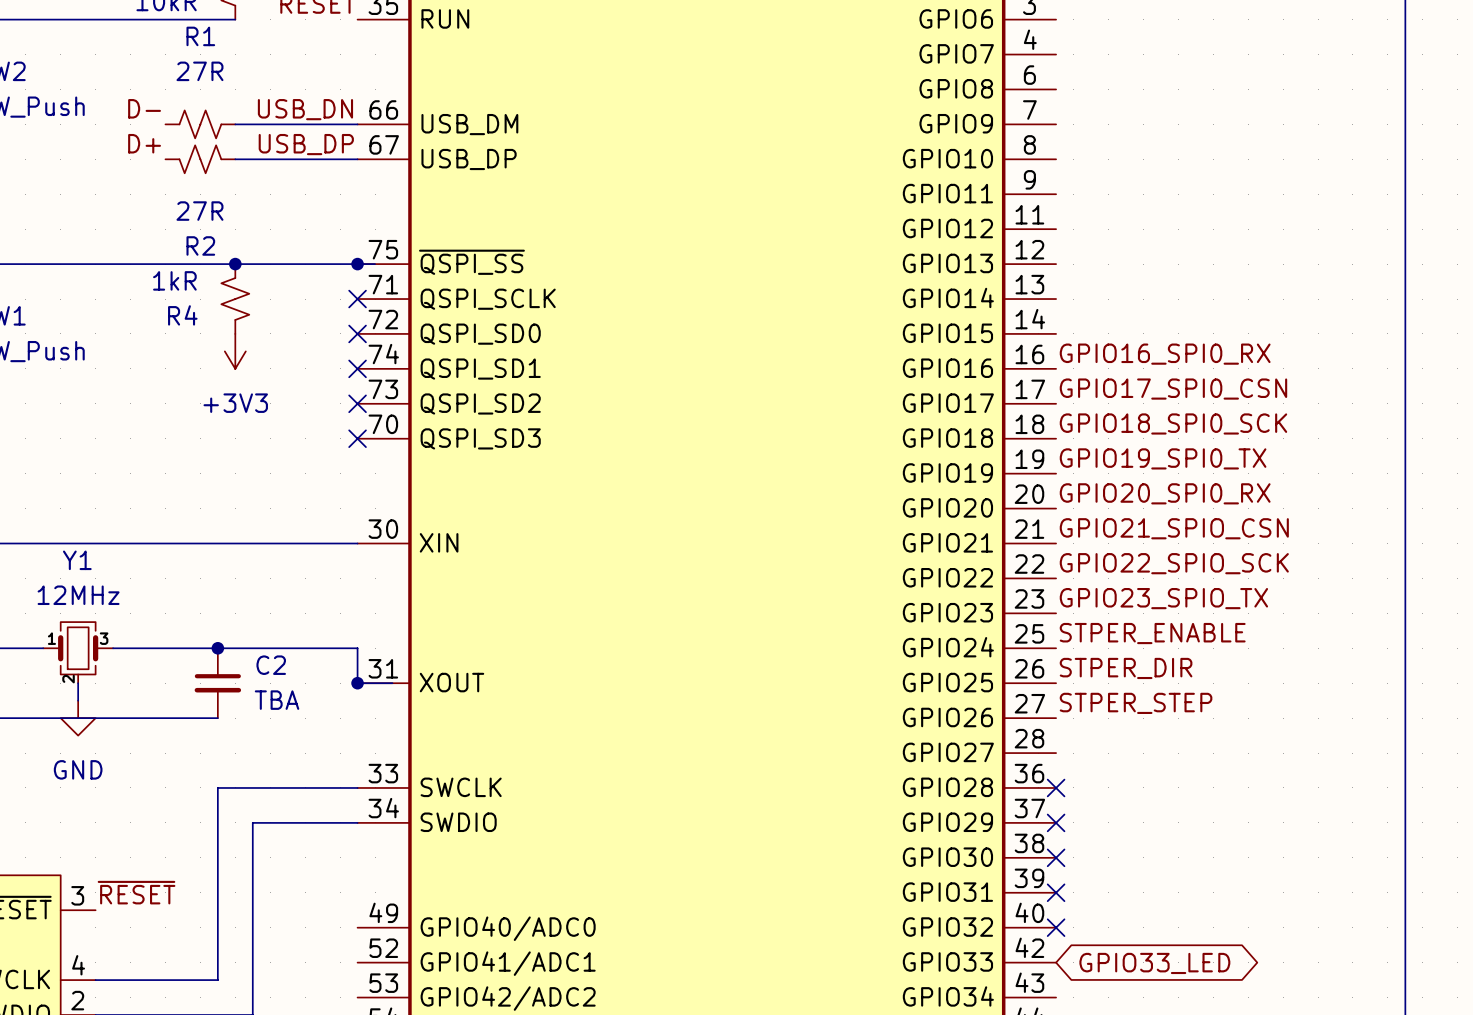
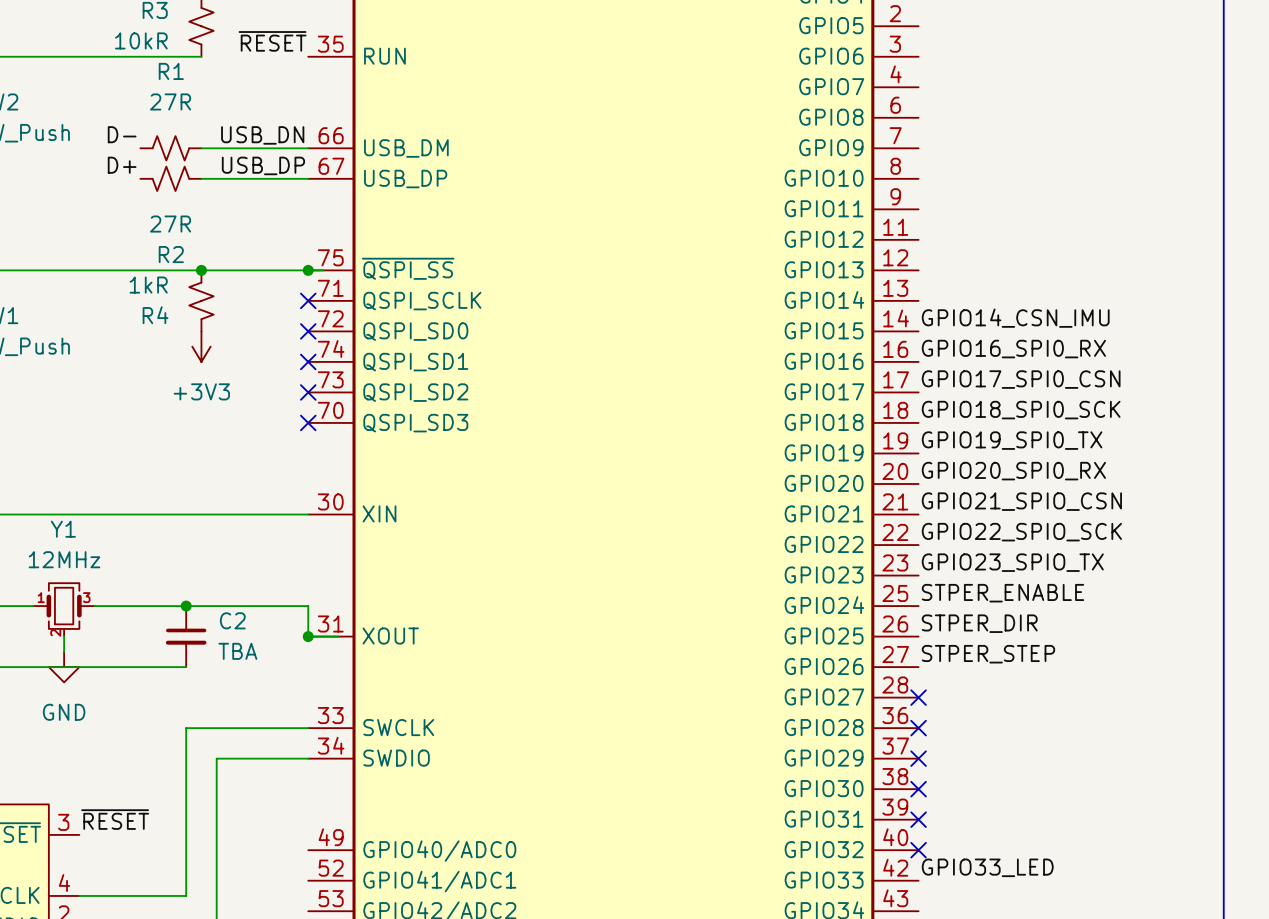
label: none -> GPIO14_CSN_IMU (1015, 318)
no-connect mark: none -> (918, 697)
label: none -> GPIO33_LED (987, 867)
global label: GPIO33_LED (1154, 963) -> none

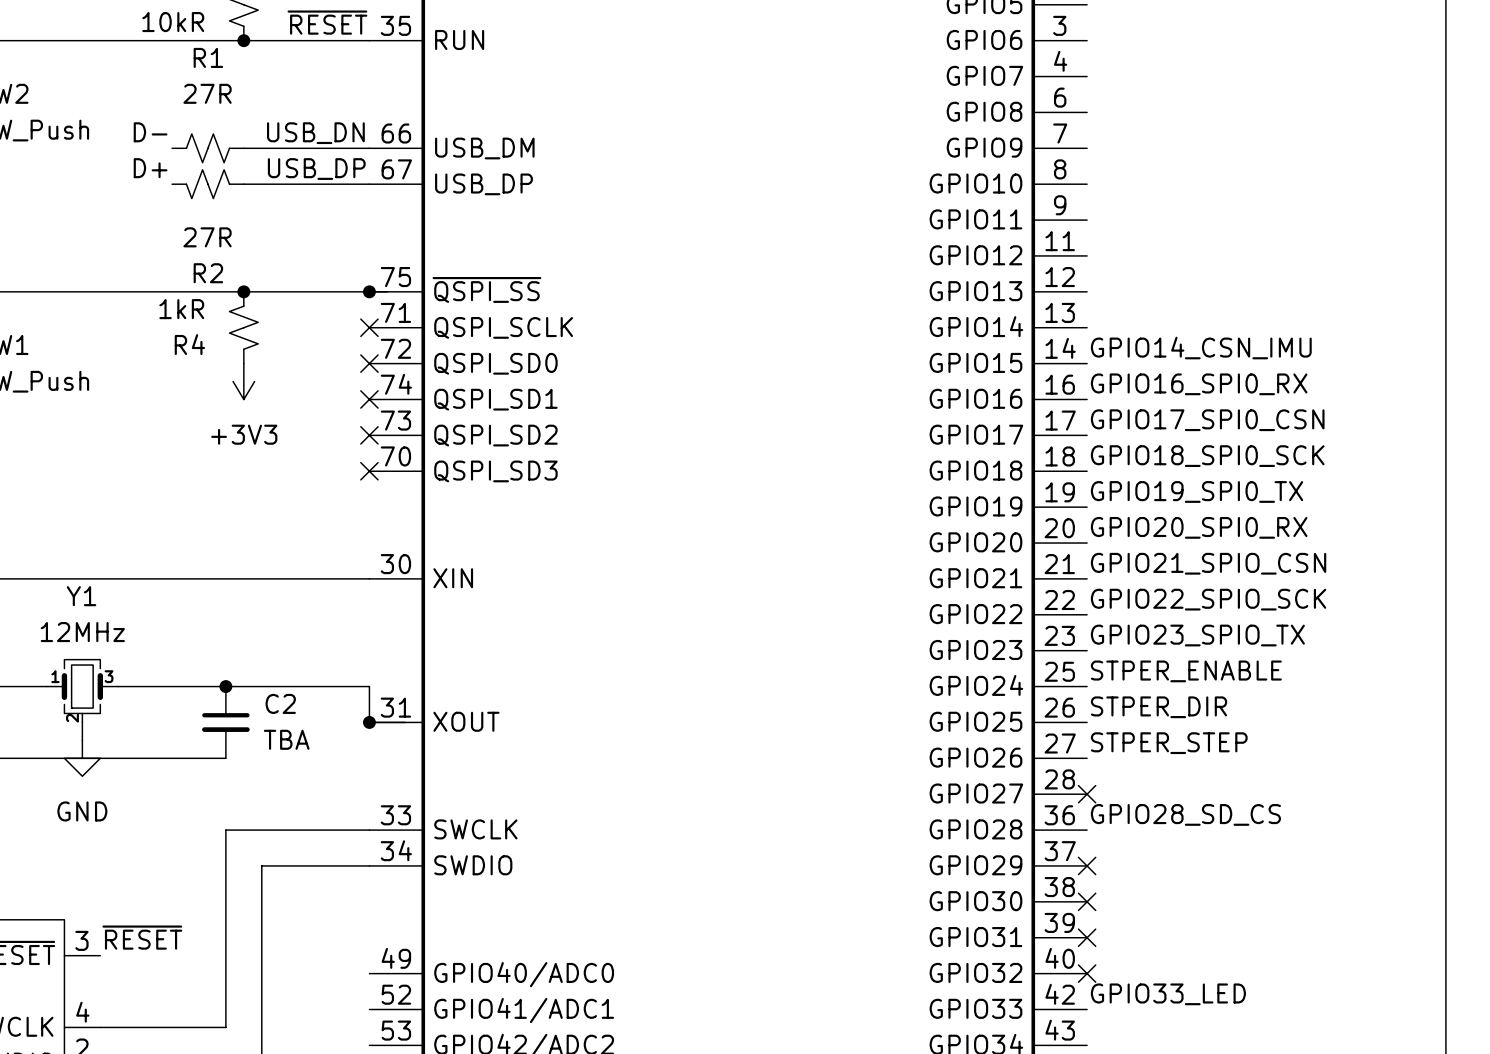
wire: none -> (243, 40) (369, 40)
junction: none -> (243, 40)
label: none -> GPIO28_SD_CS (1185, 814)
no-connect mark: (918, 728) -> none

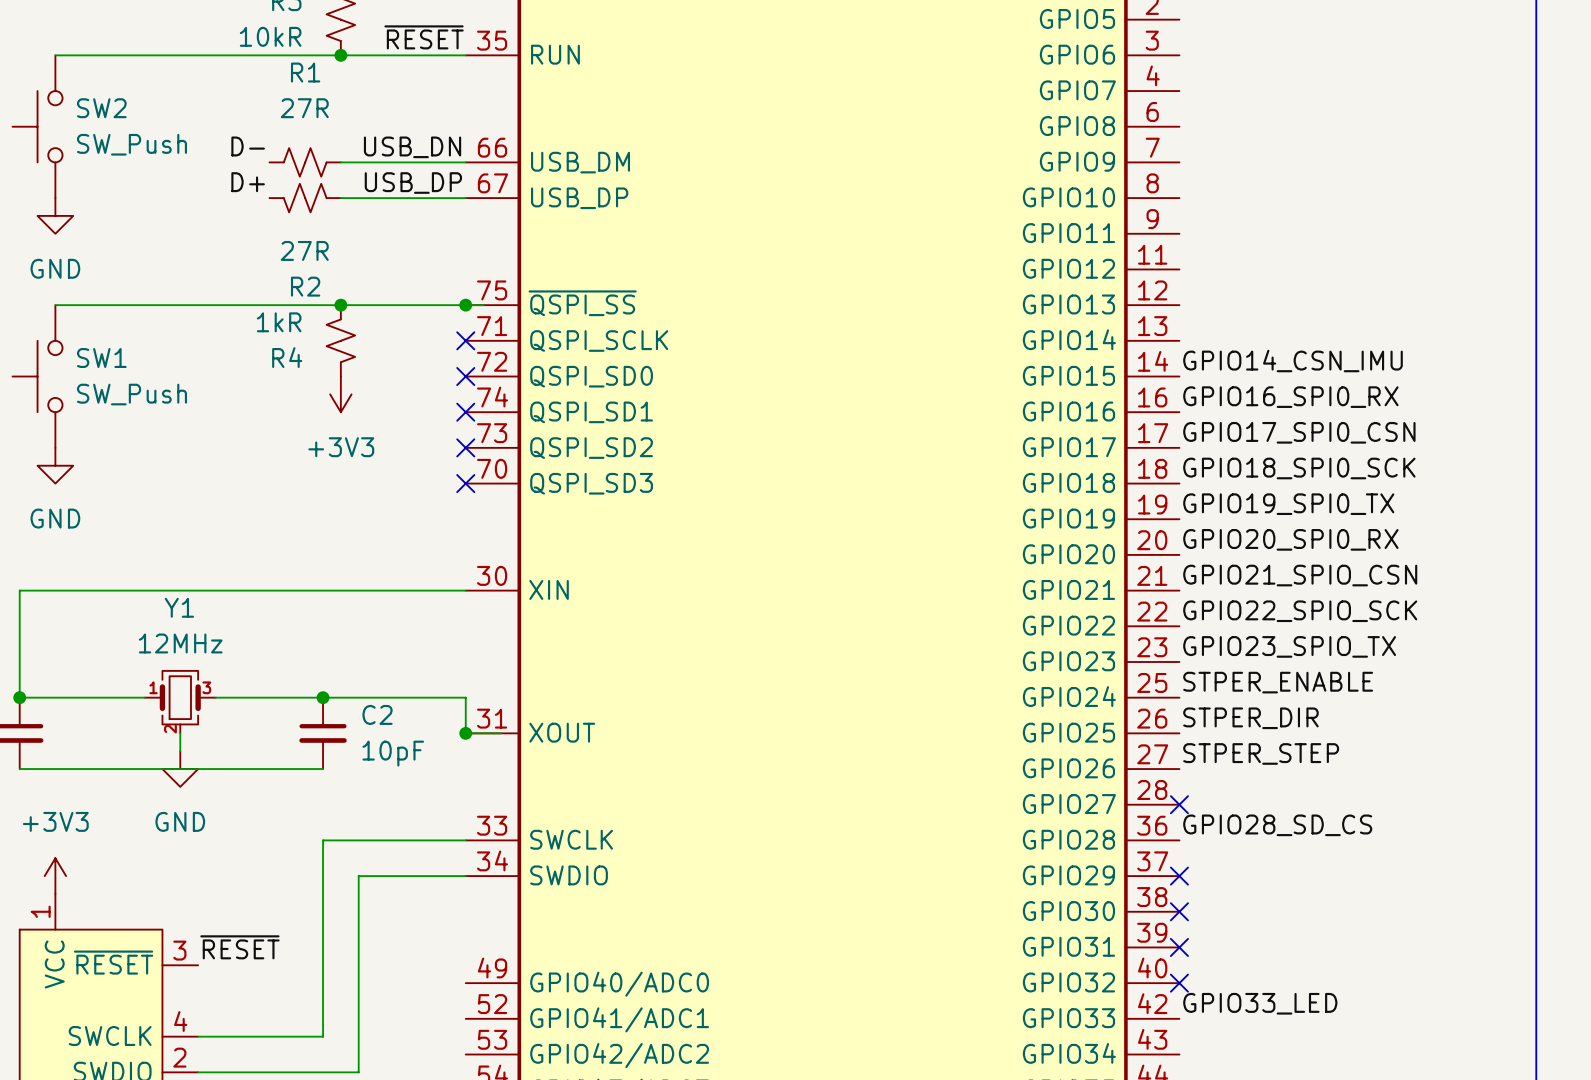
C2 value: TBA (286, 739) -> 10pF (393, 753)

